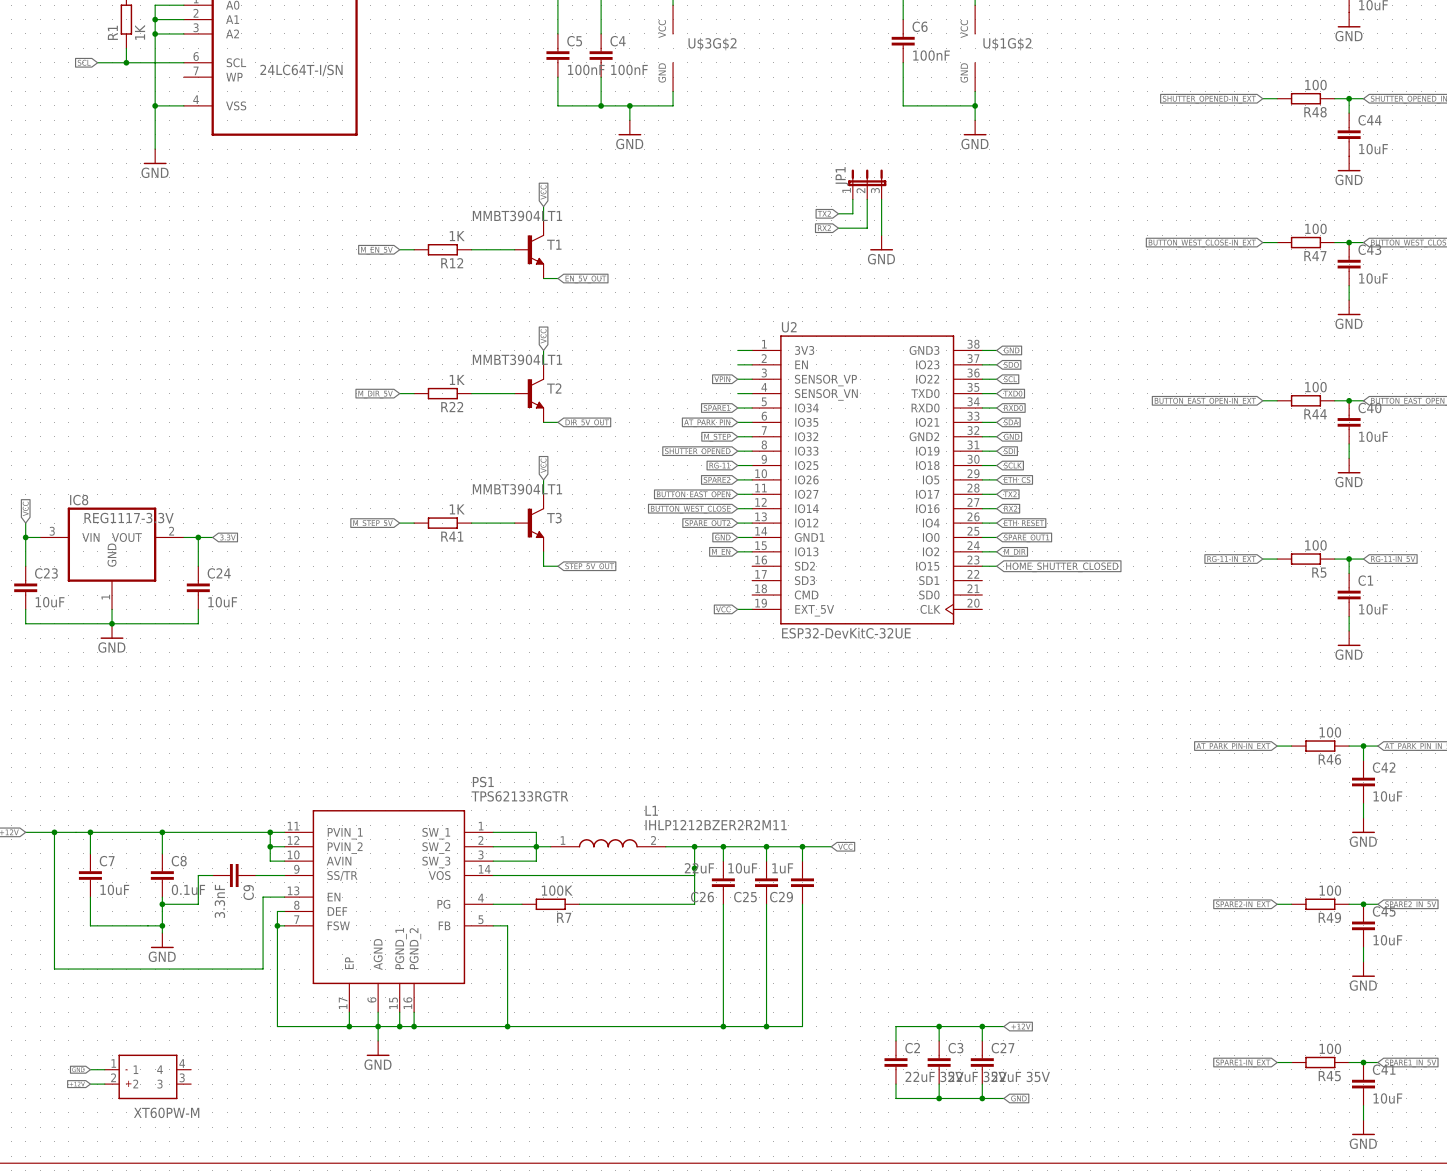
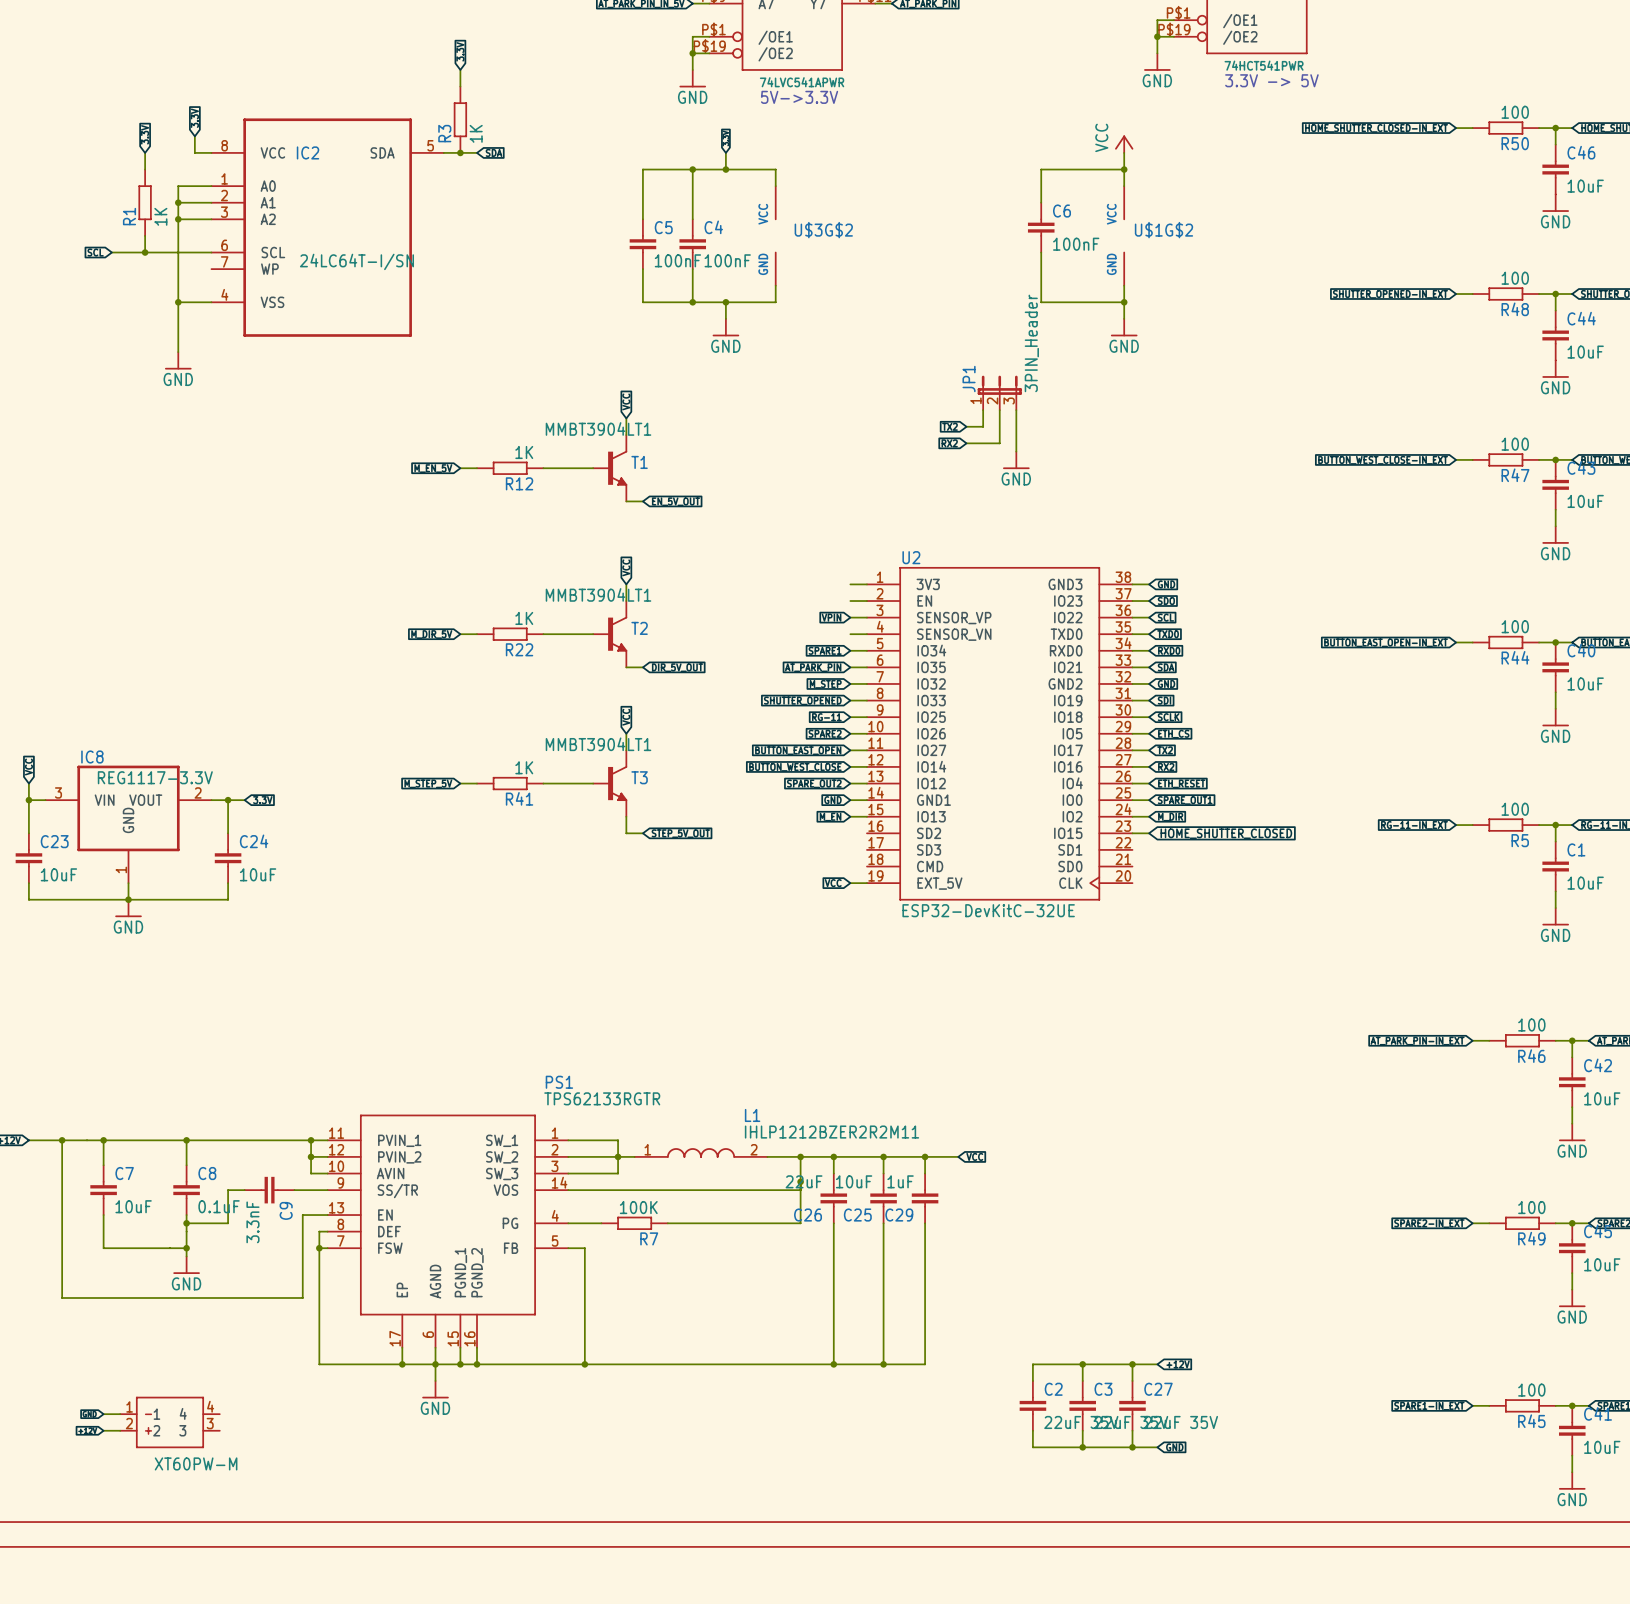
JP1 value: none -> 3PIN_Header (1031, 343)

